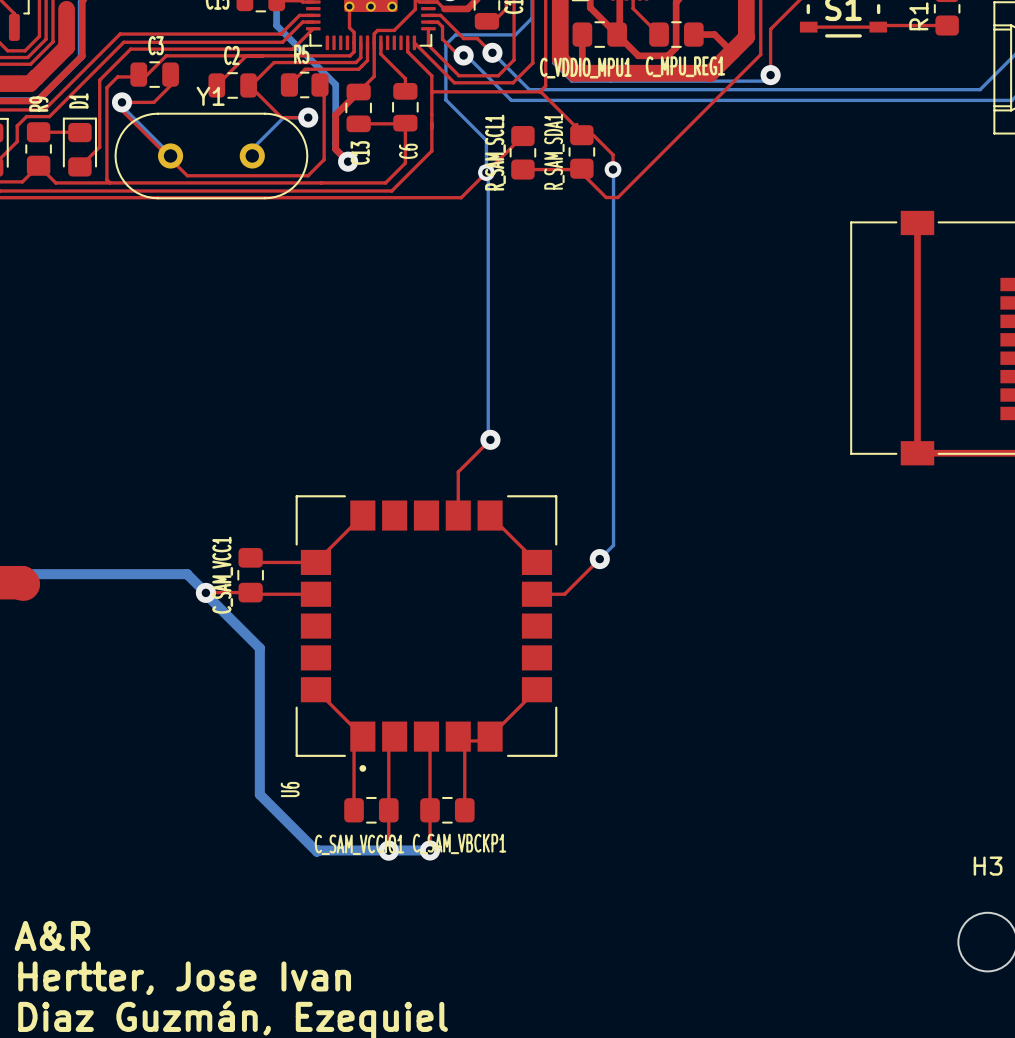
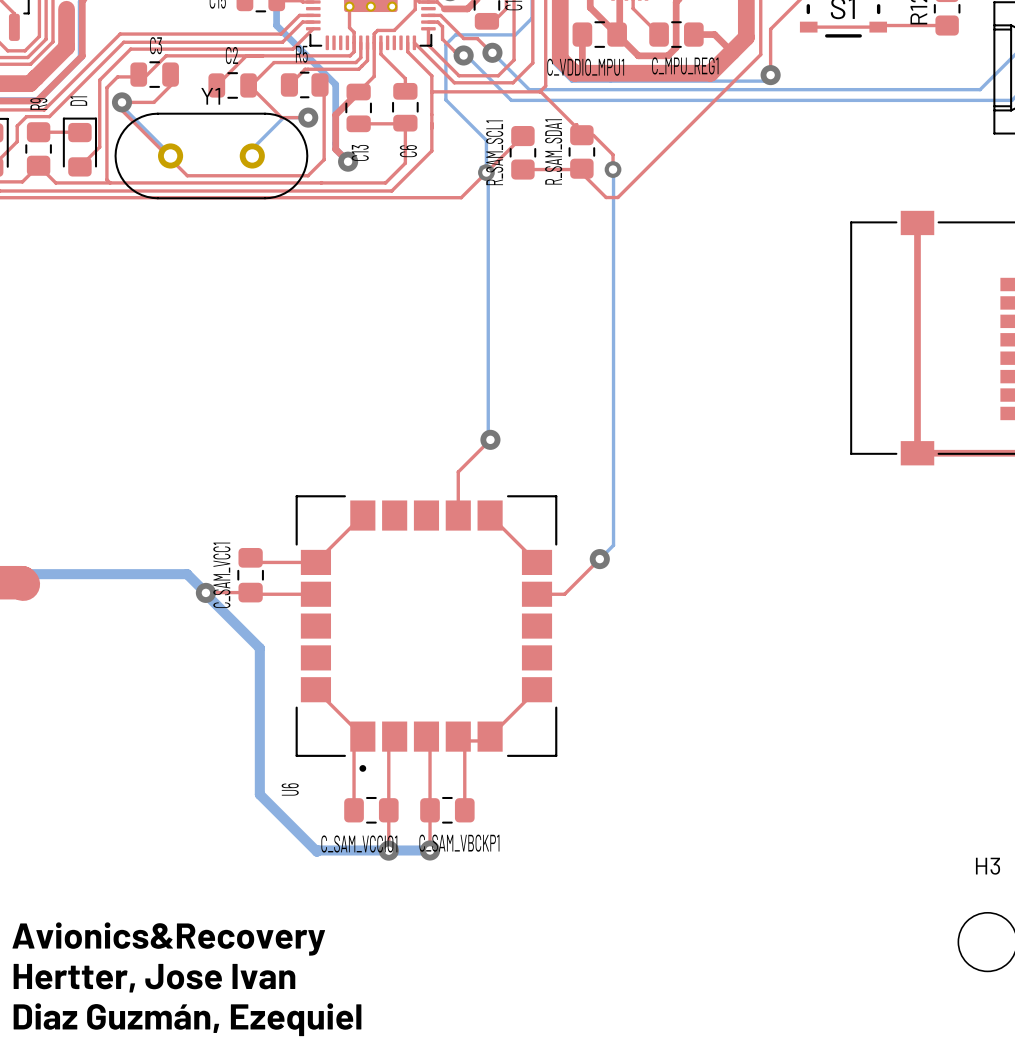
text: A&R (52, 936) -> Avionics&Recovery (168, 939)

